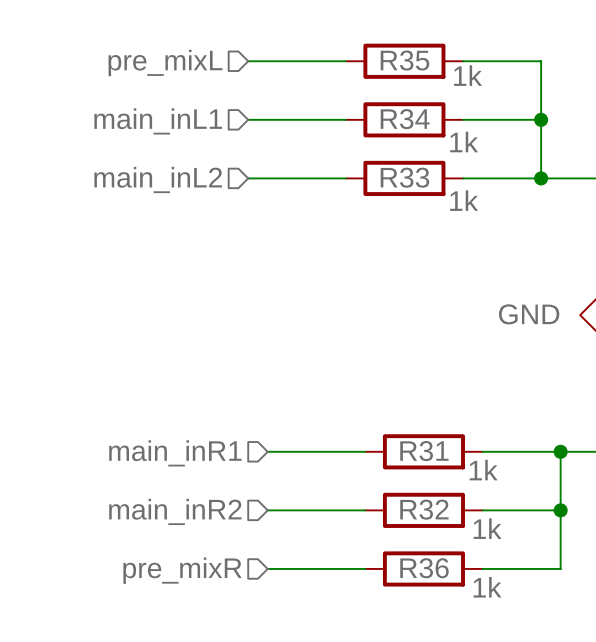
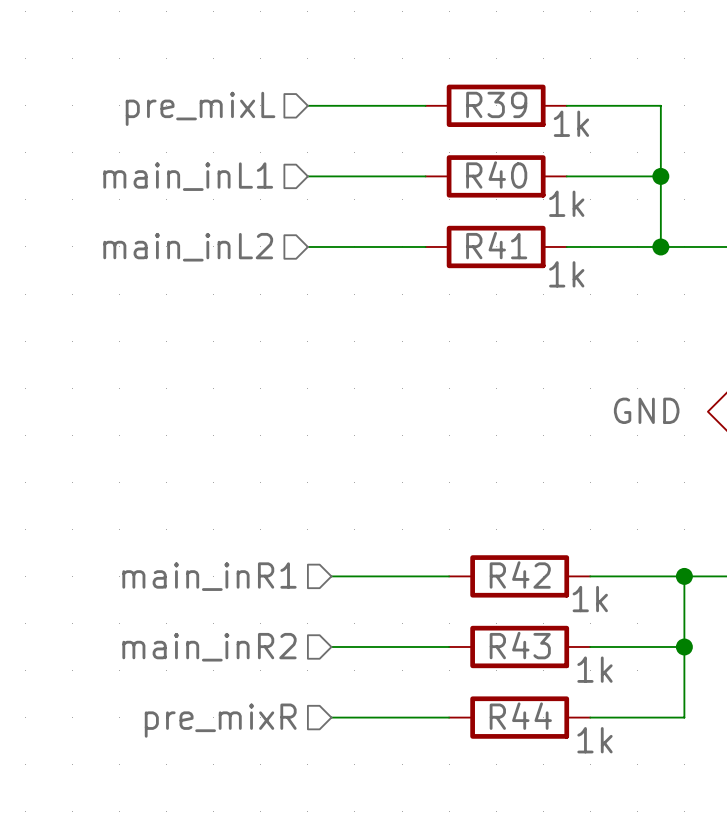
R35 name: R35 (404, 60) -> R39 (496, 104)
R34 name: R34 (405, 119) -> R40 (496, 174)
R33 name: R33 (404, 177) -> R41 (496, 245)
R31 name: R31 (424, 451) -> R42 (520, 574)
R32 name: R32 (424, 509) -> R43 (520, 645)
R36 name: R36 (424, 568) -> R44 (520, 716)

